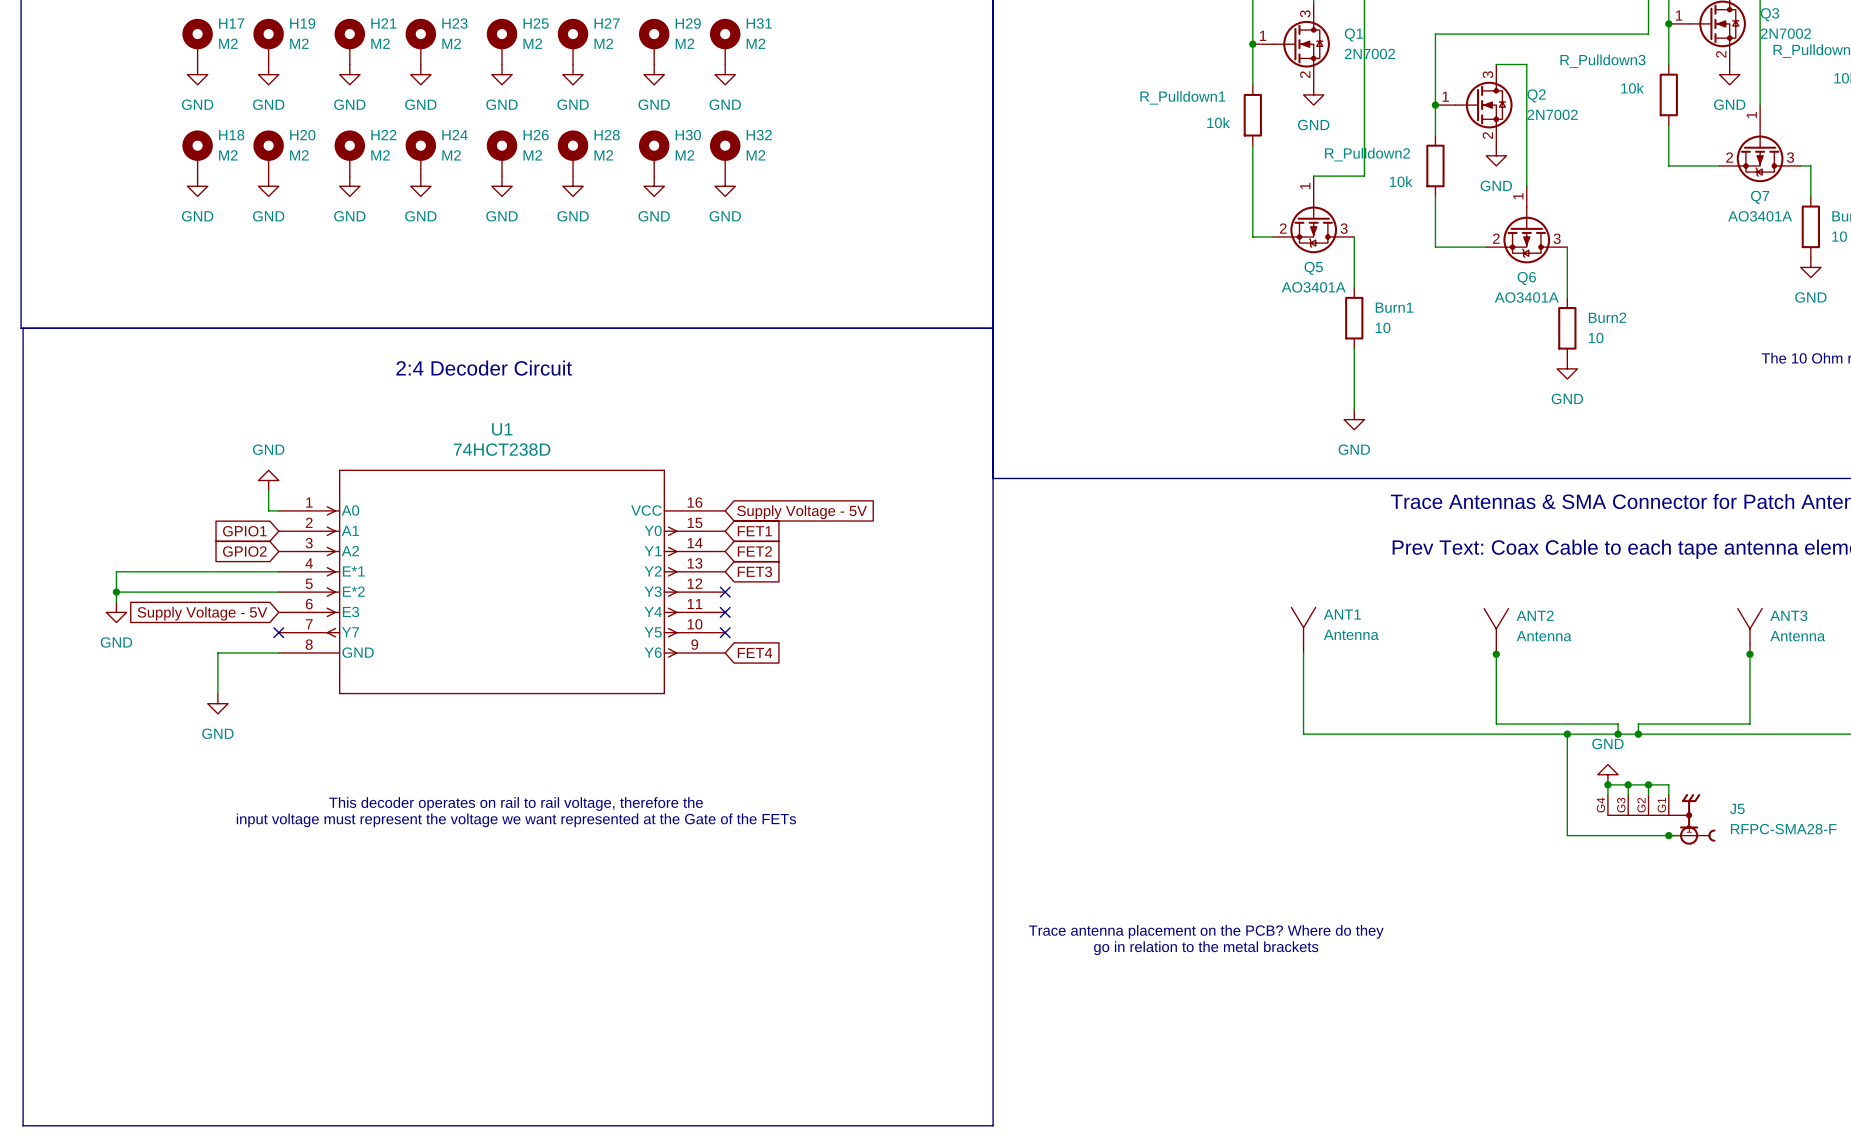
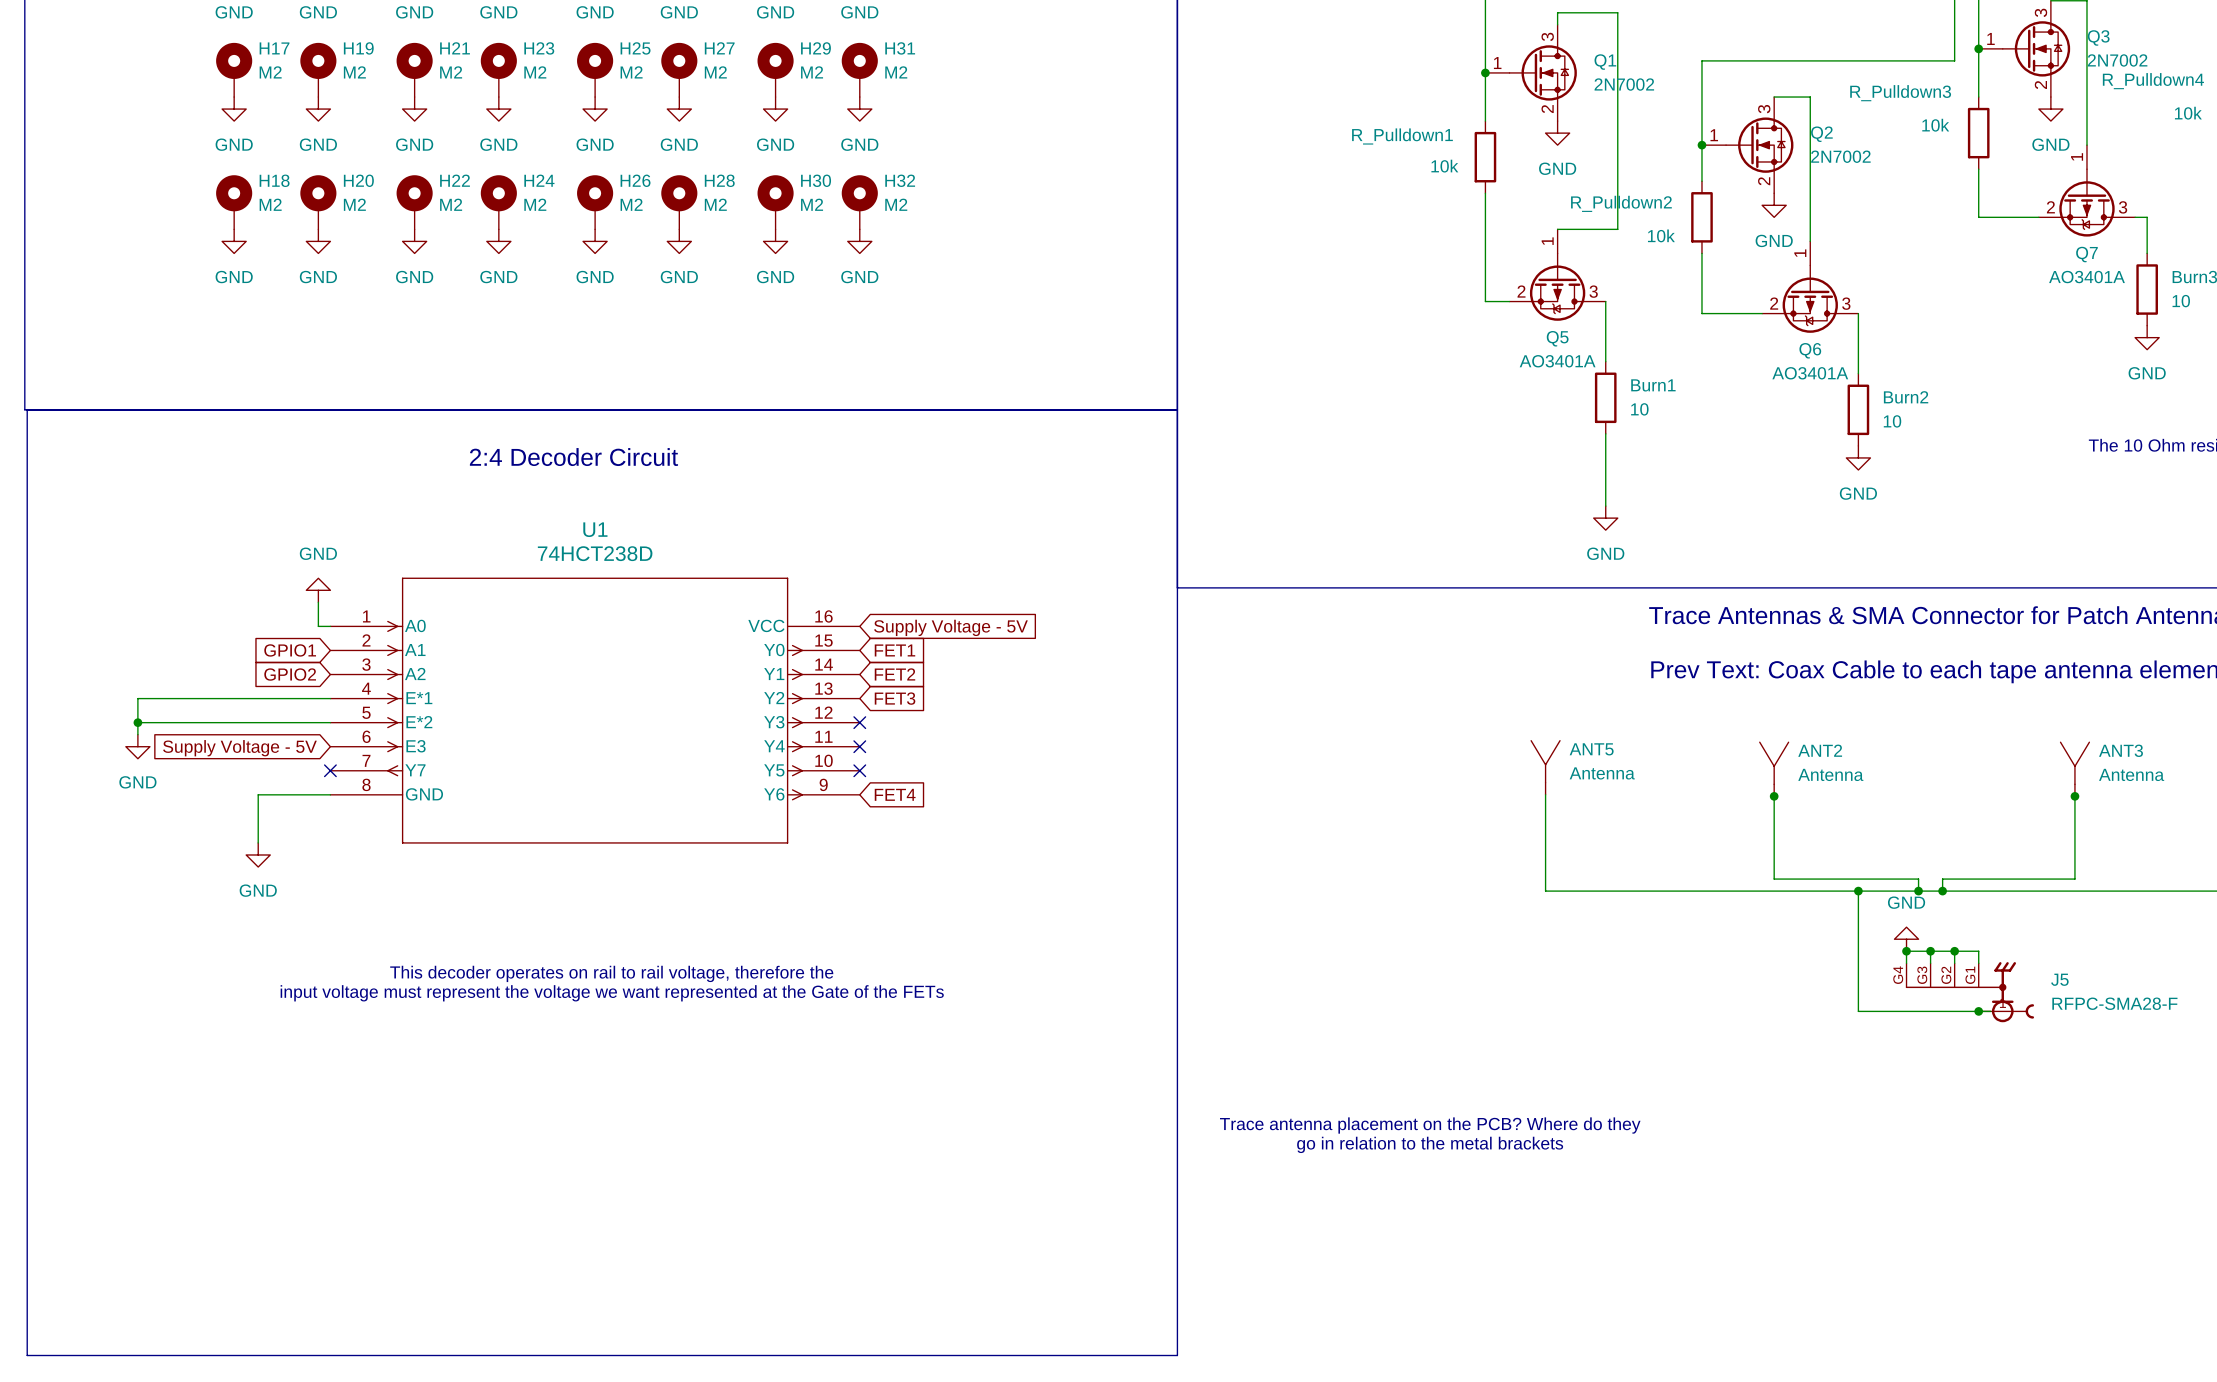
ANT1 name: ANT1 (1342, 614) -> ANT5 (1591, 749)

